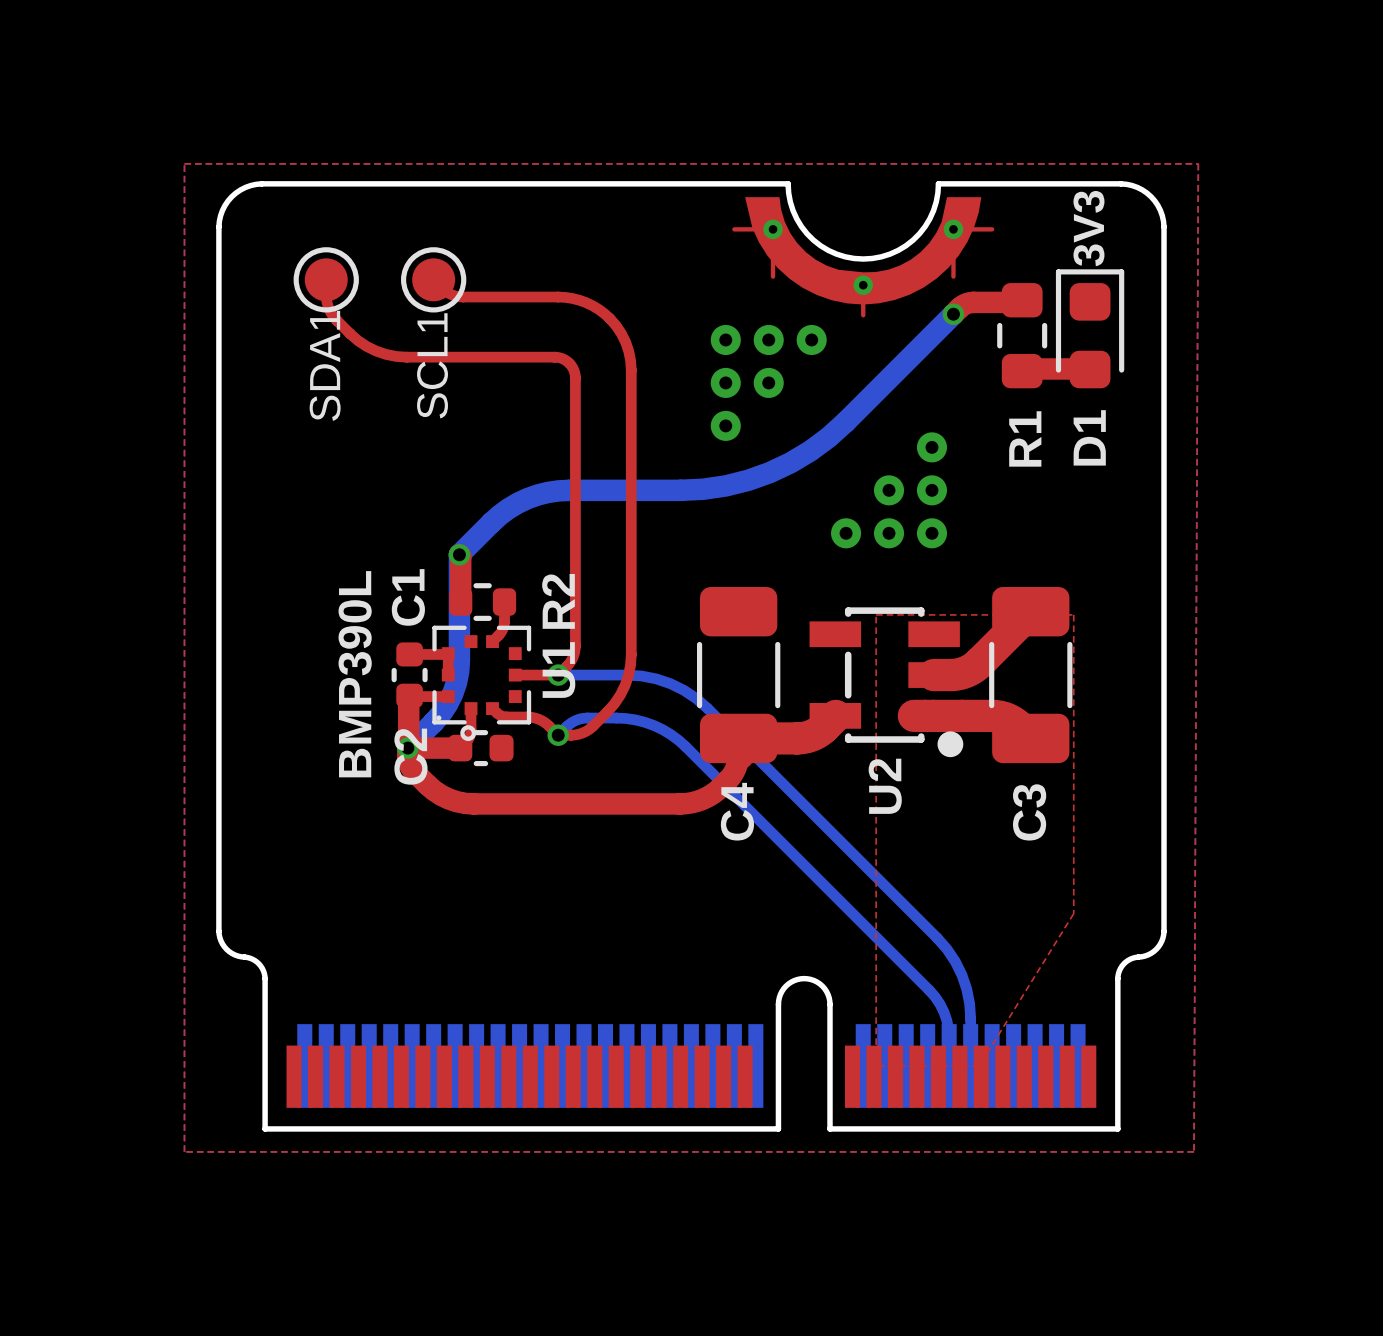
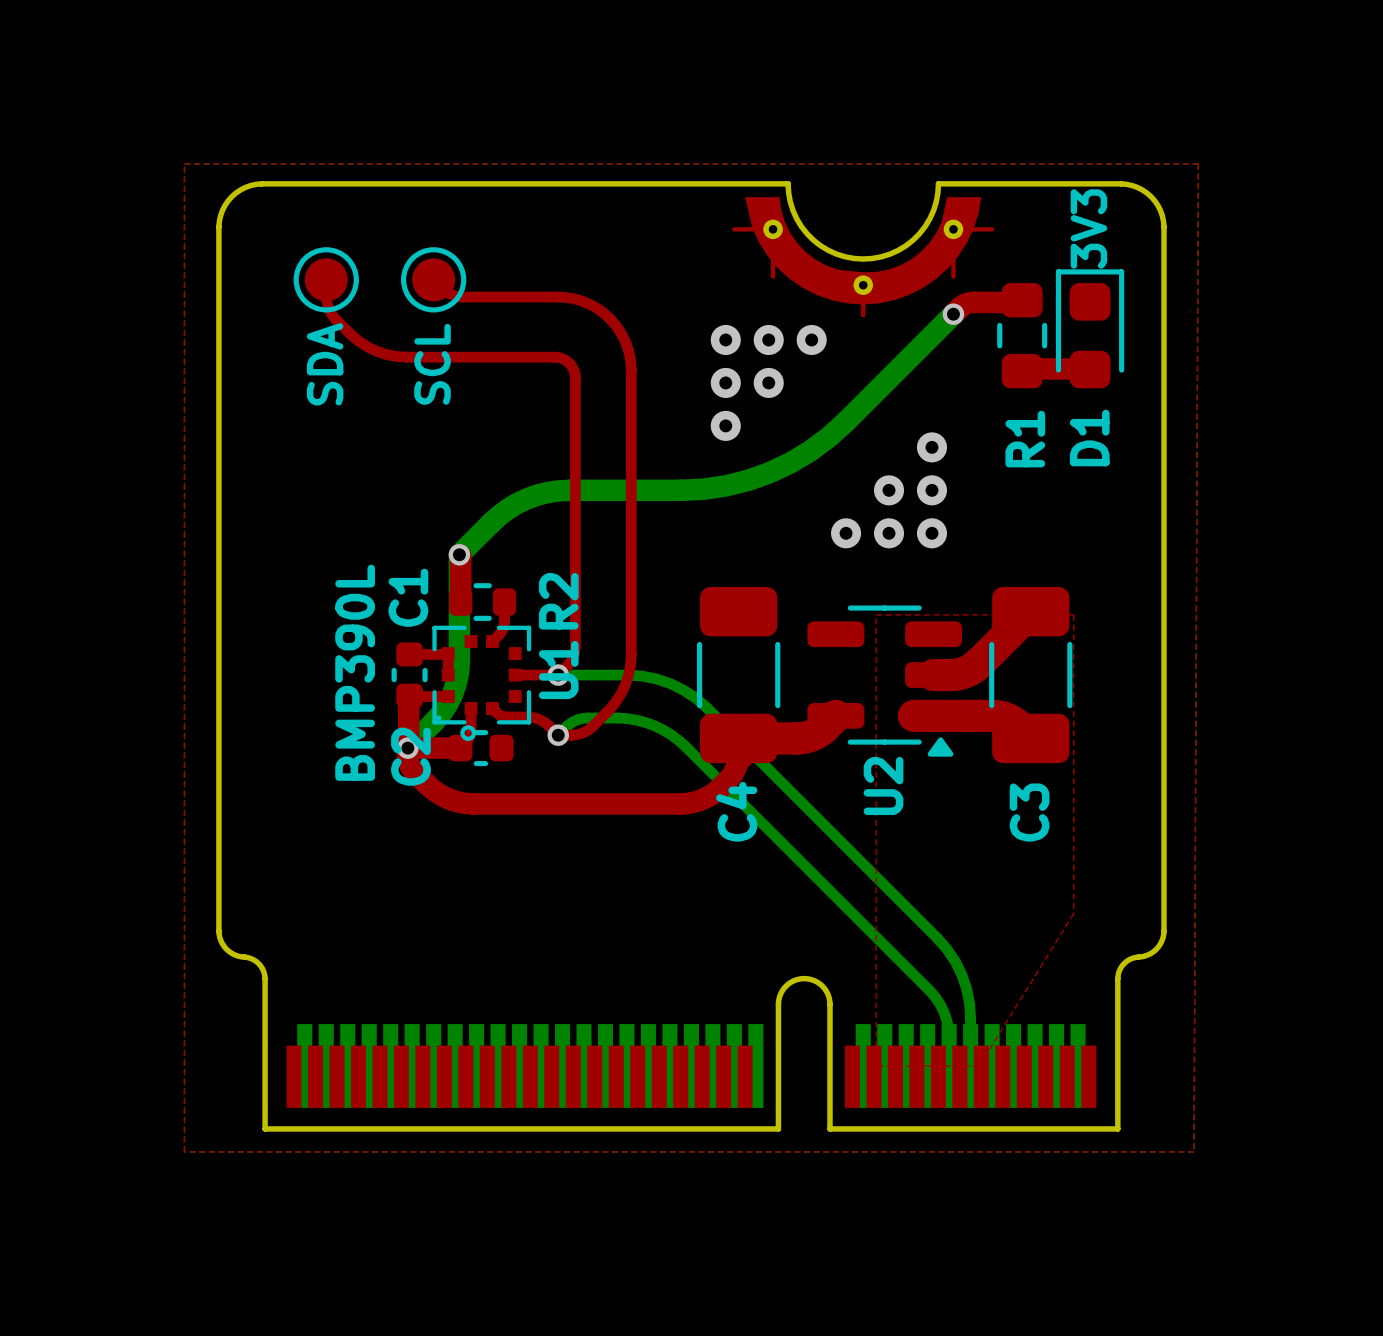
SDA1 name: SDA1 (325, 365) -> SDA (325, 364)
SCL1 name: SCL1 (432, 365) -> SCL (432, 364)
U2 footprint: [809, 607, 964, 758] -> [807, 605, 963, 757]

